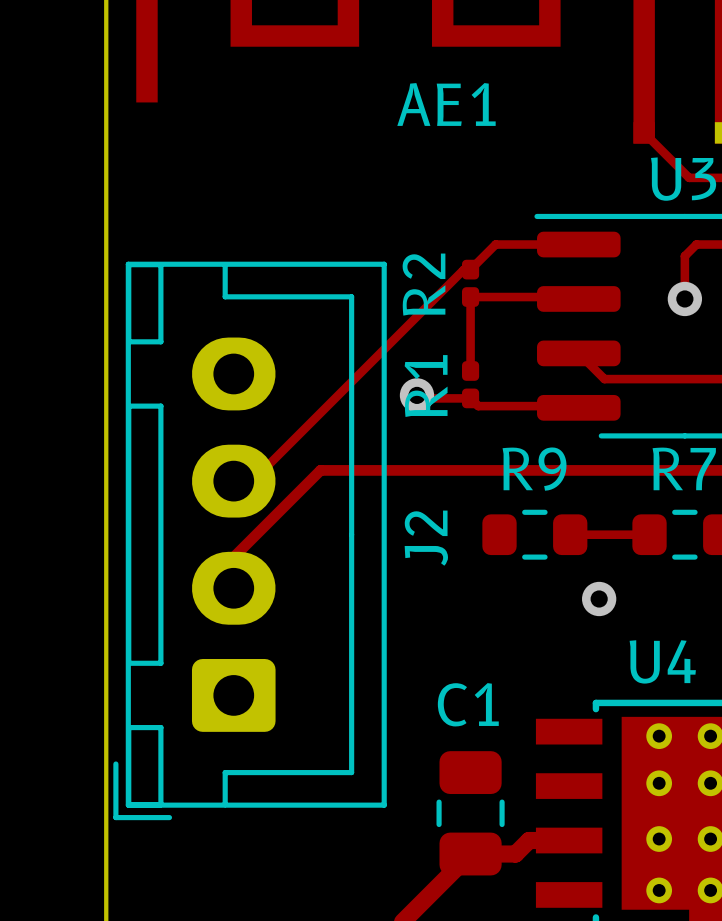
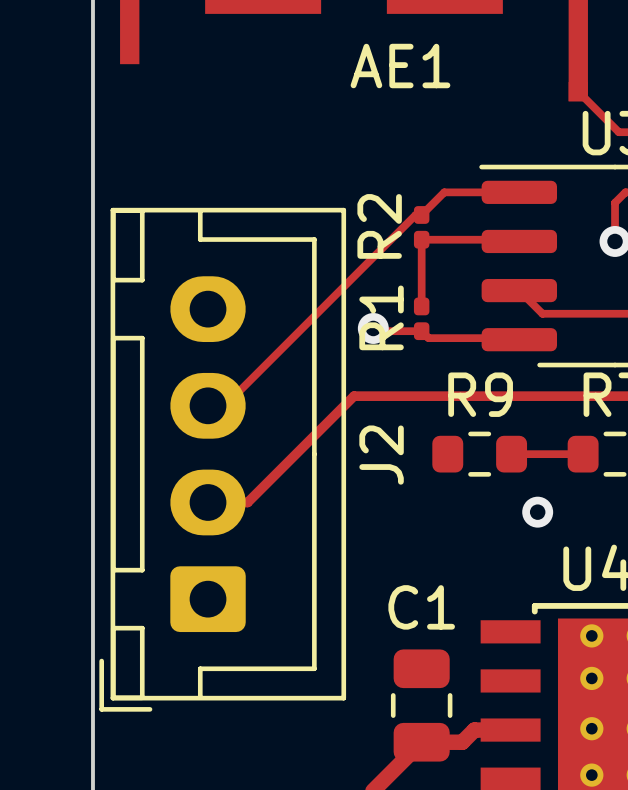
track: (395, 470) (320, 470) (233, 557) -> (354, 396) (247, 502) (208, 502)

